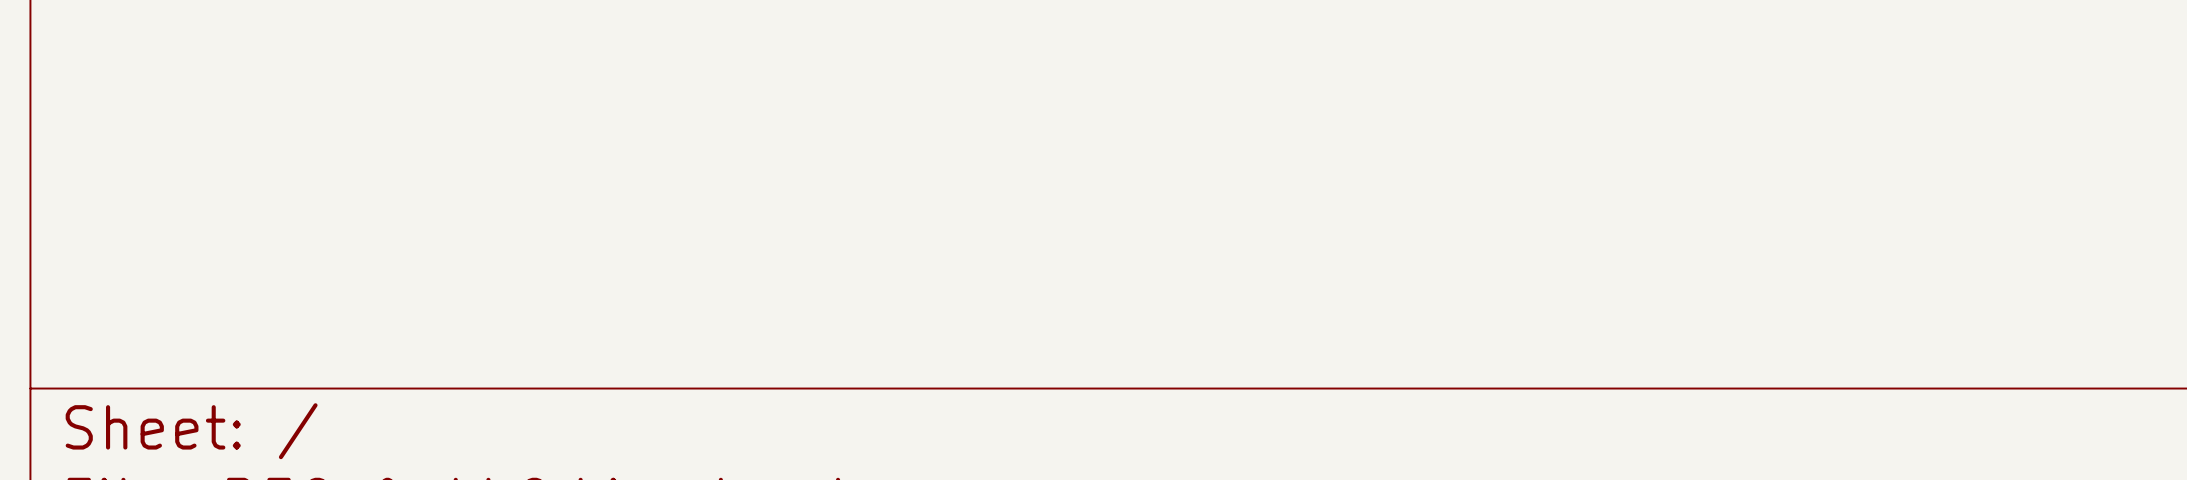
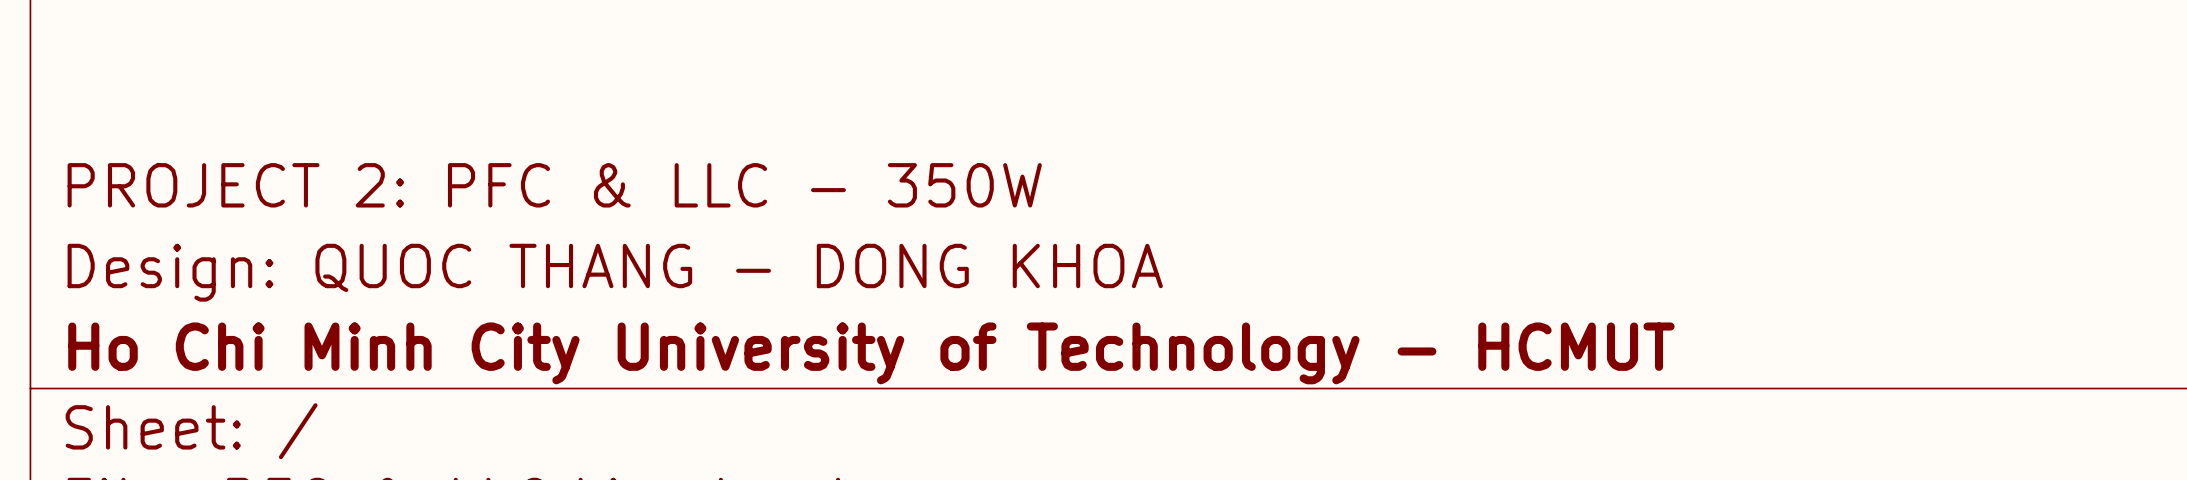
title block: none -> PROJECT 2: PFC & LLC - 350W (554, 185)
title block: none -> Design: QUOC THANG - DONG KHOA (615, 272)
title block: none -> Ho Chi Minh City University of Technology - HCMUT (871, 353)

